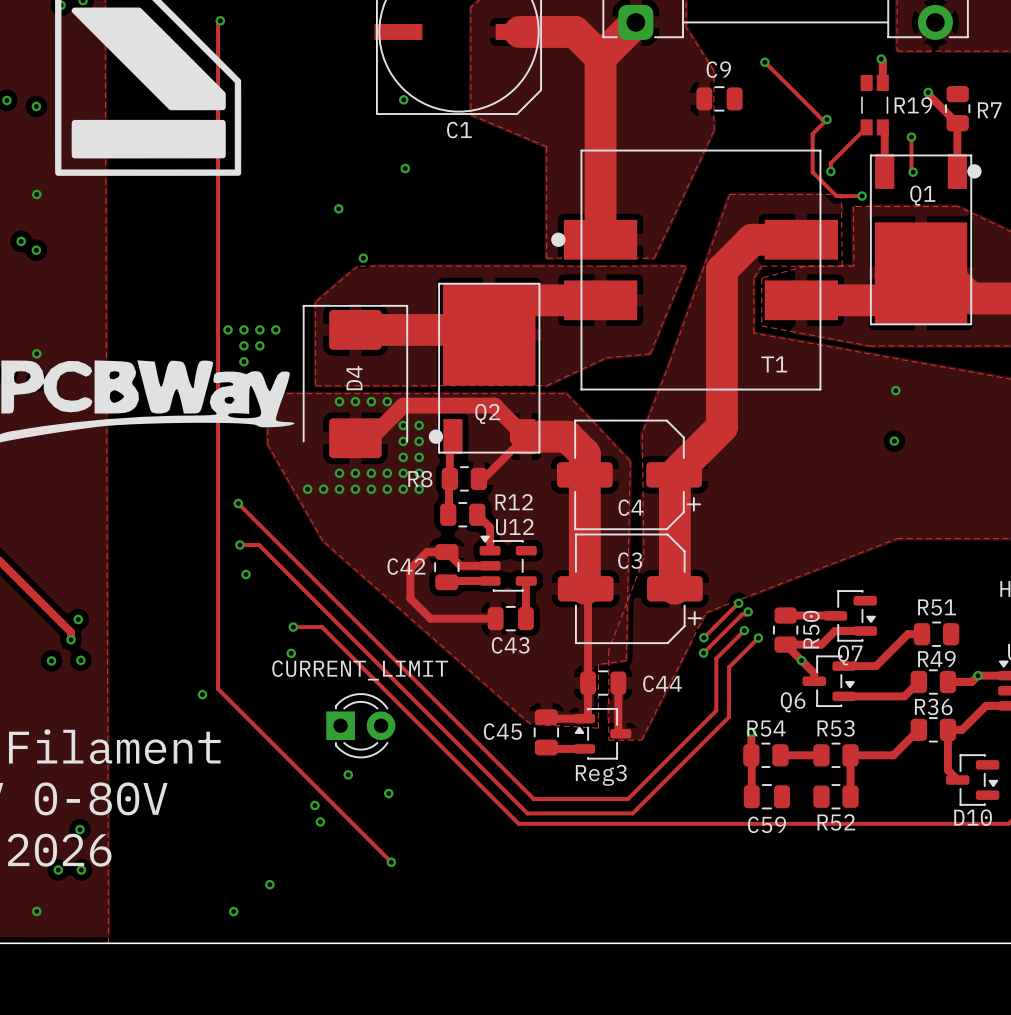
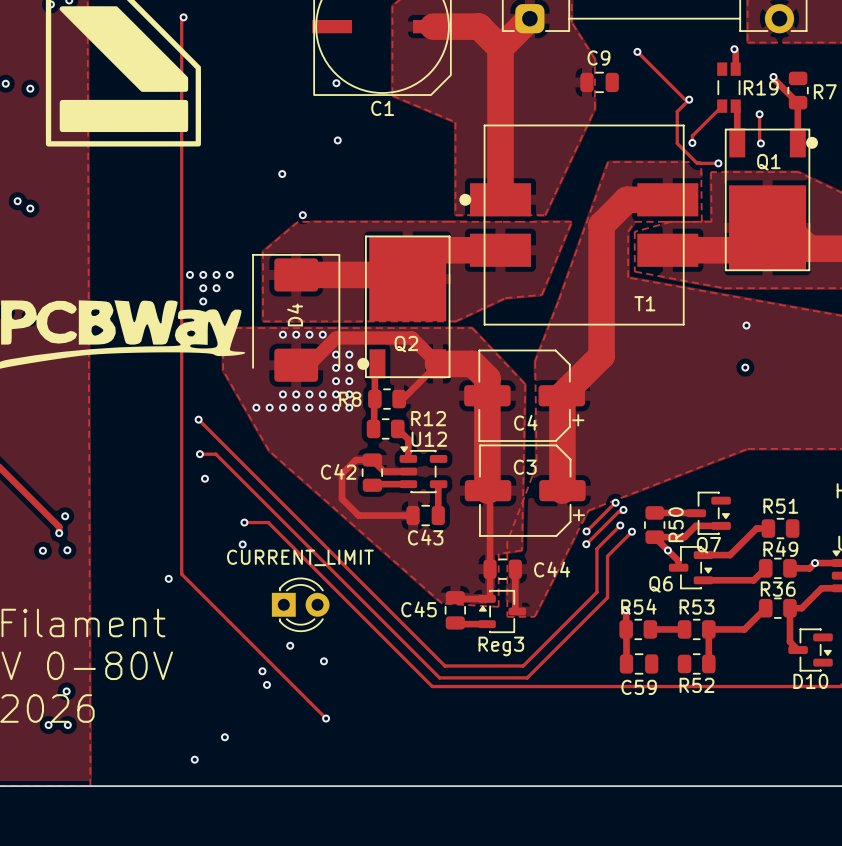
via: (36, 194) -> none
via: (36, 353) -> none
via: (36, 911) -> none

